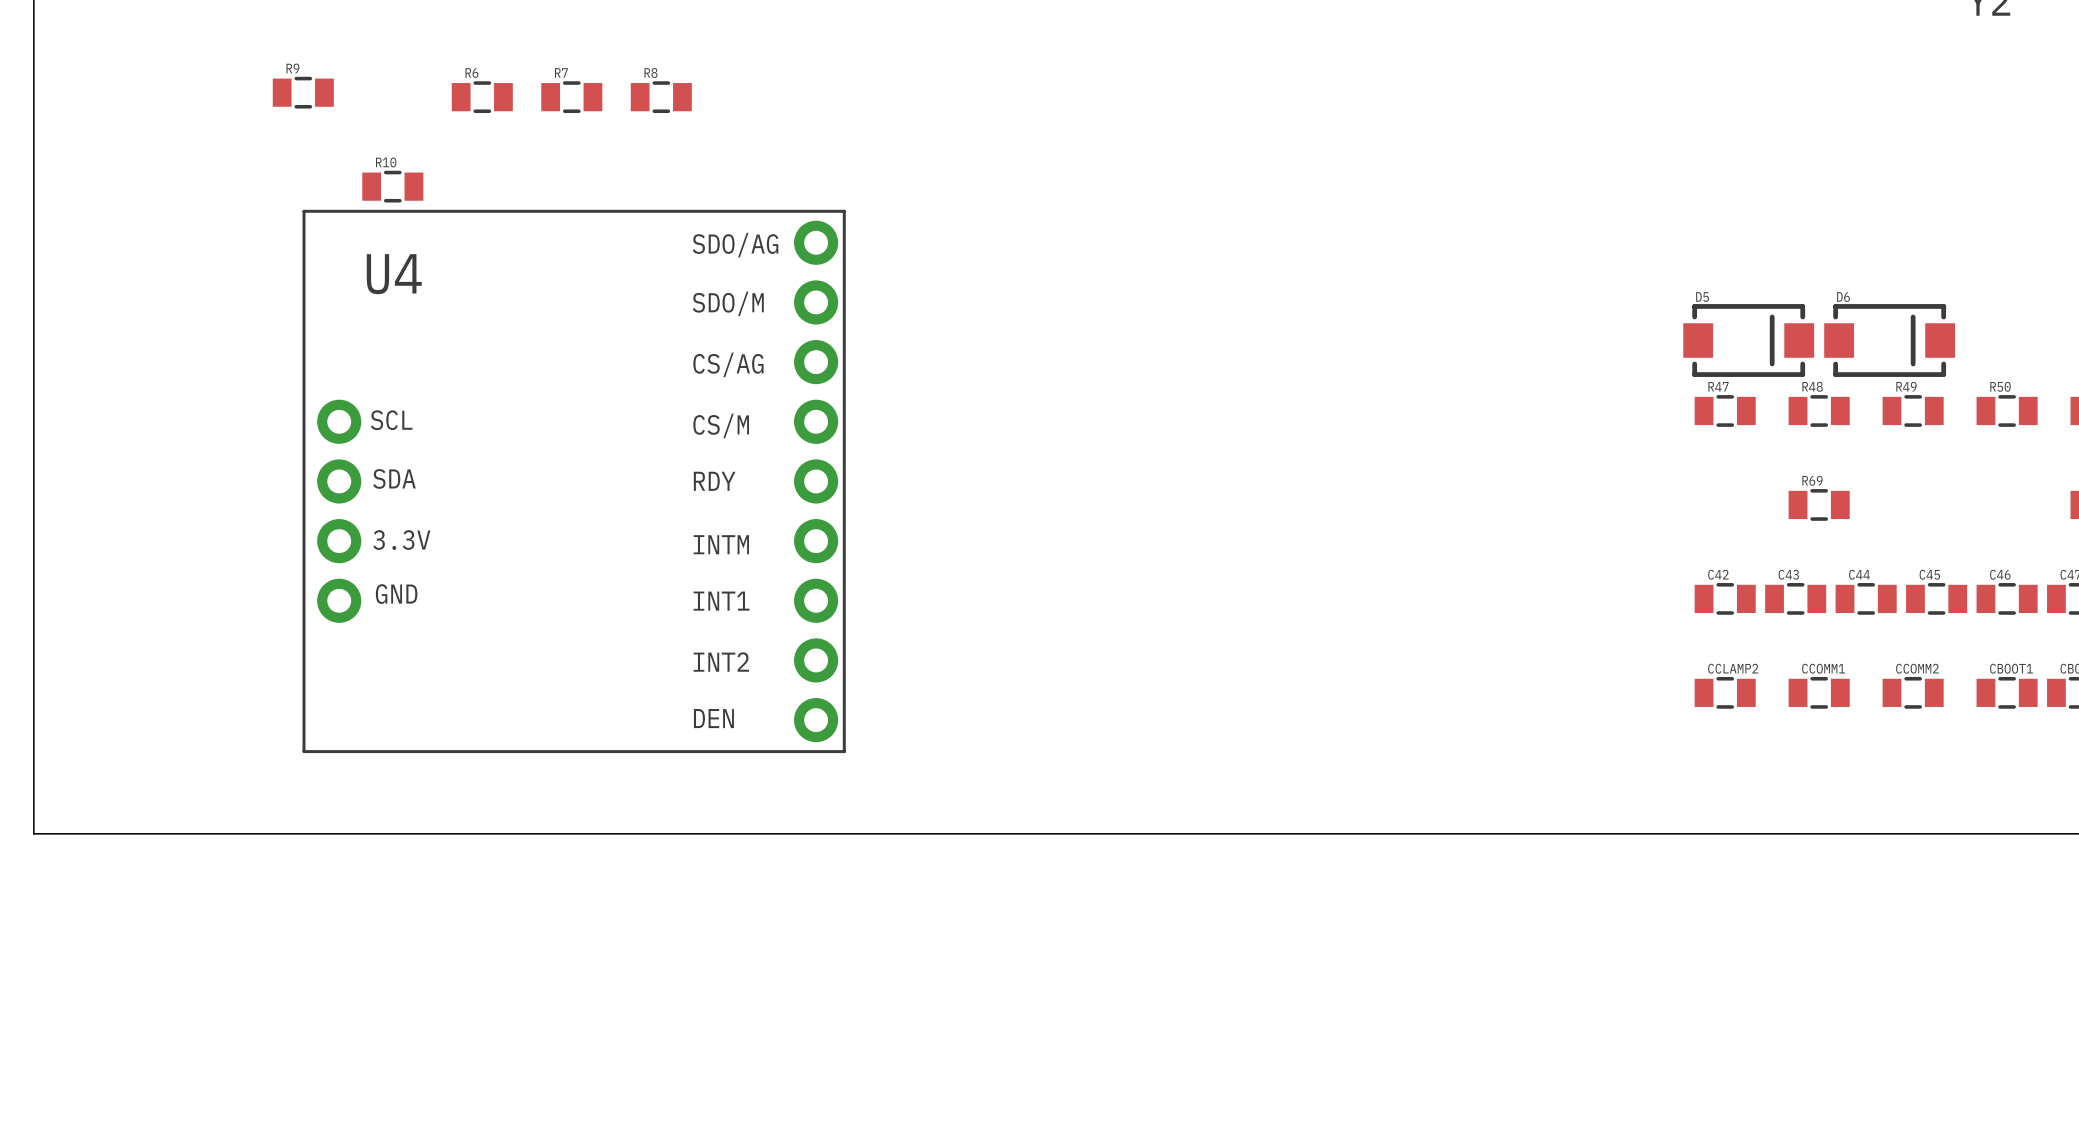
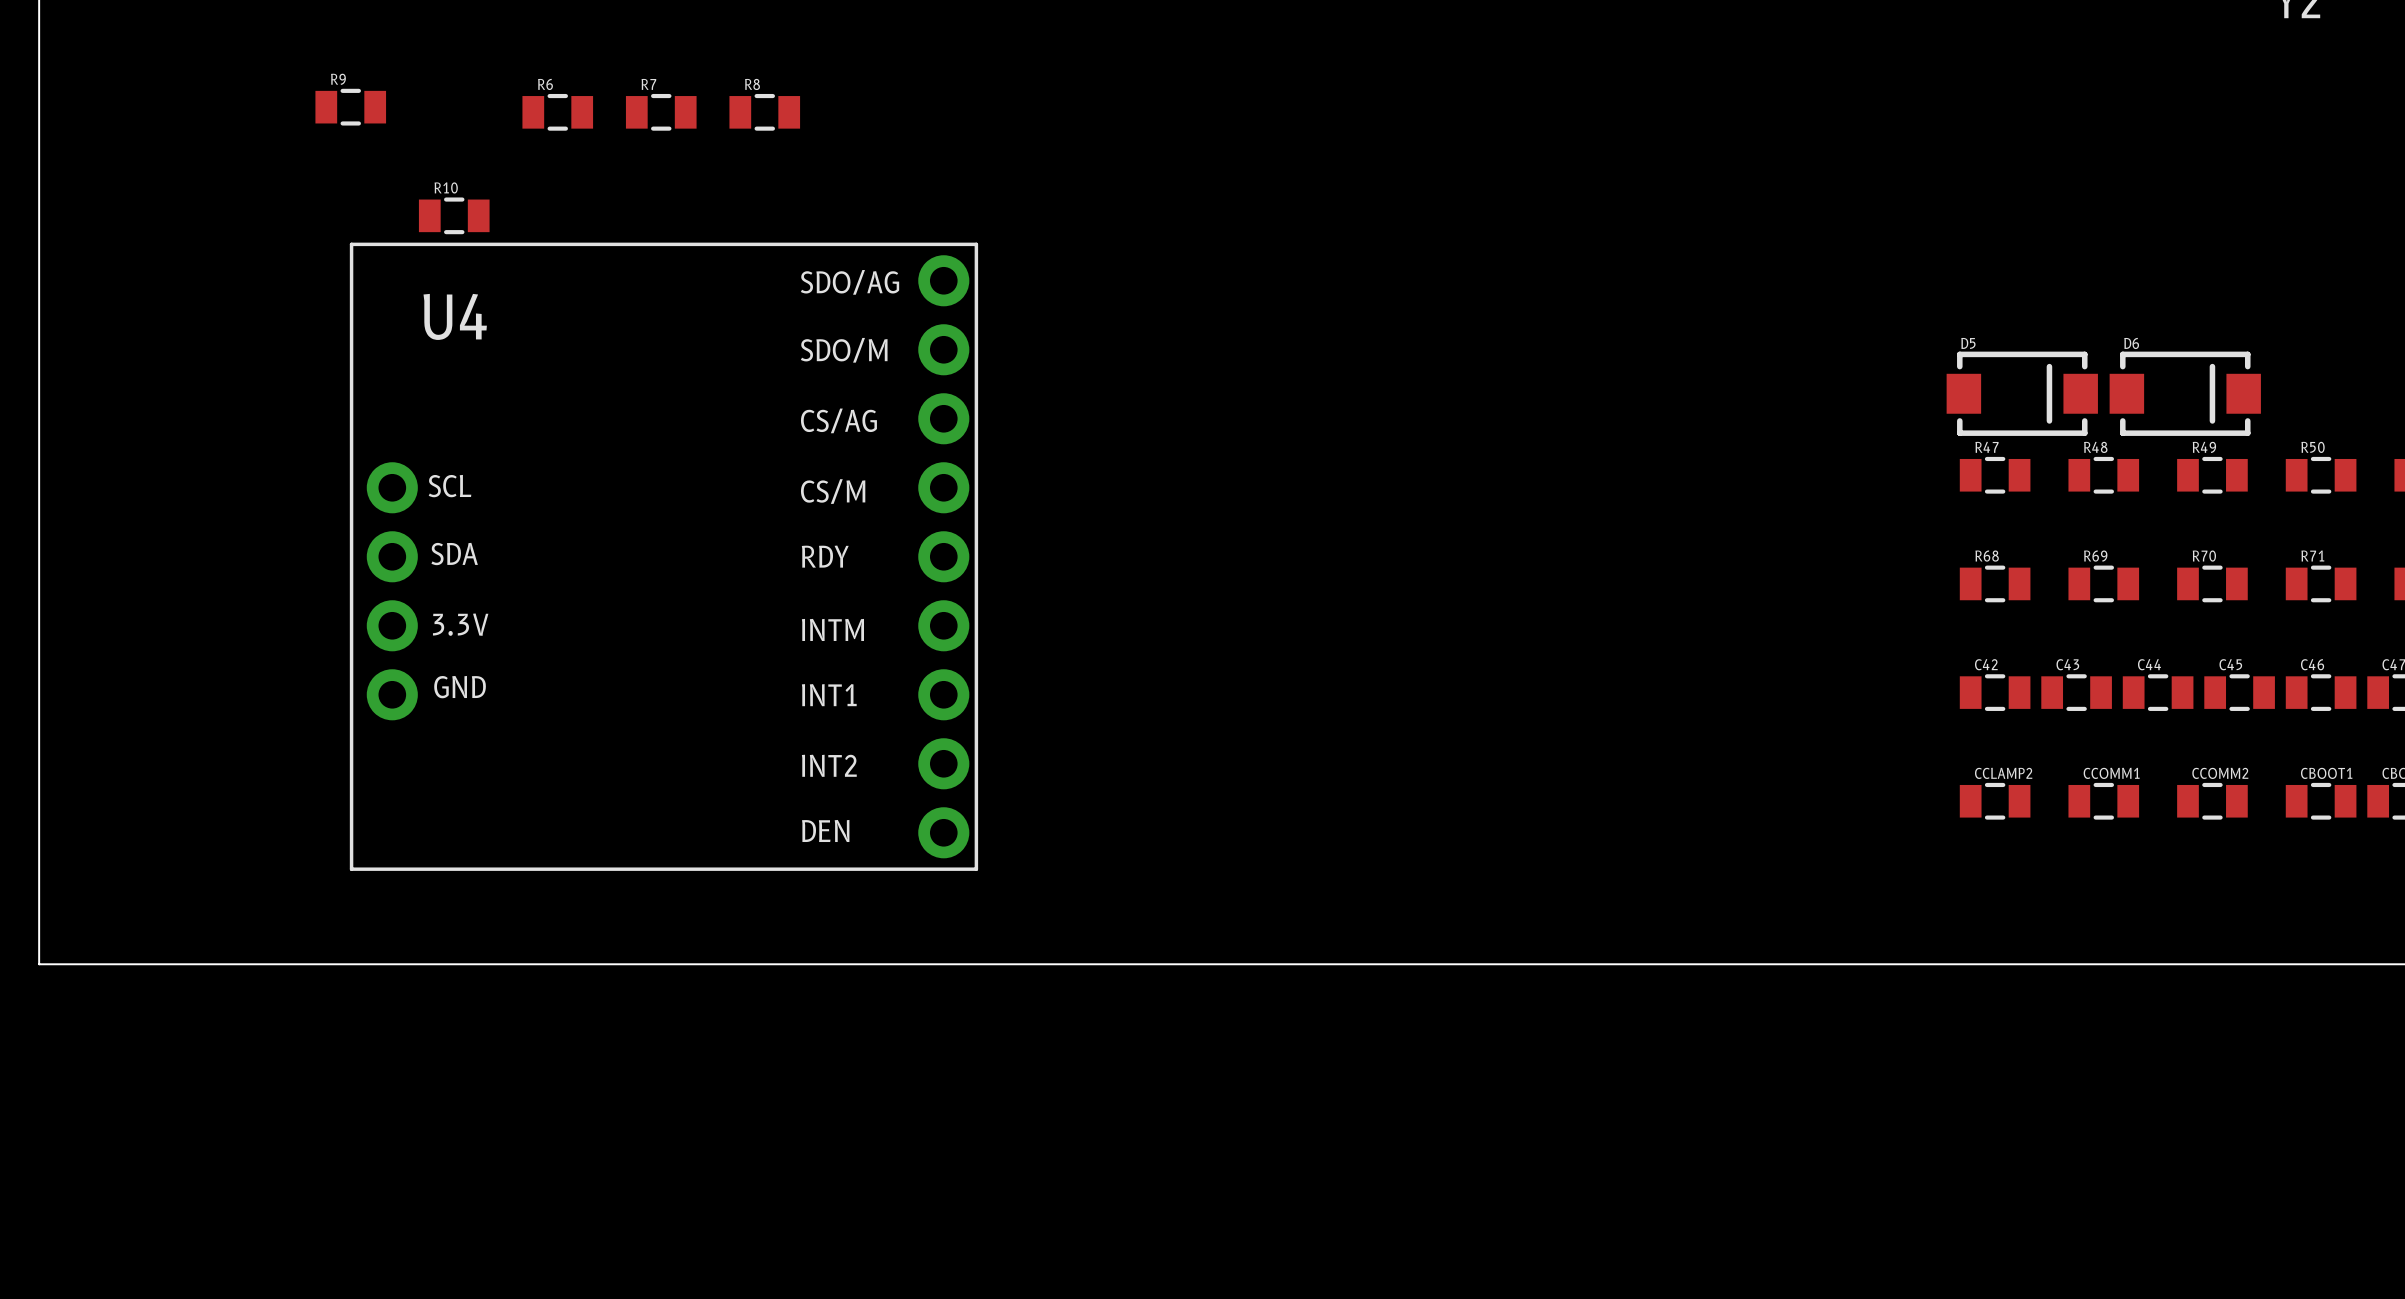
R68: none -> (1995, 583)
R70: none -> (2212, 583)
R71: none -> (2321, 583)

